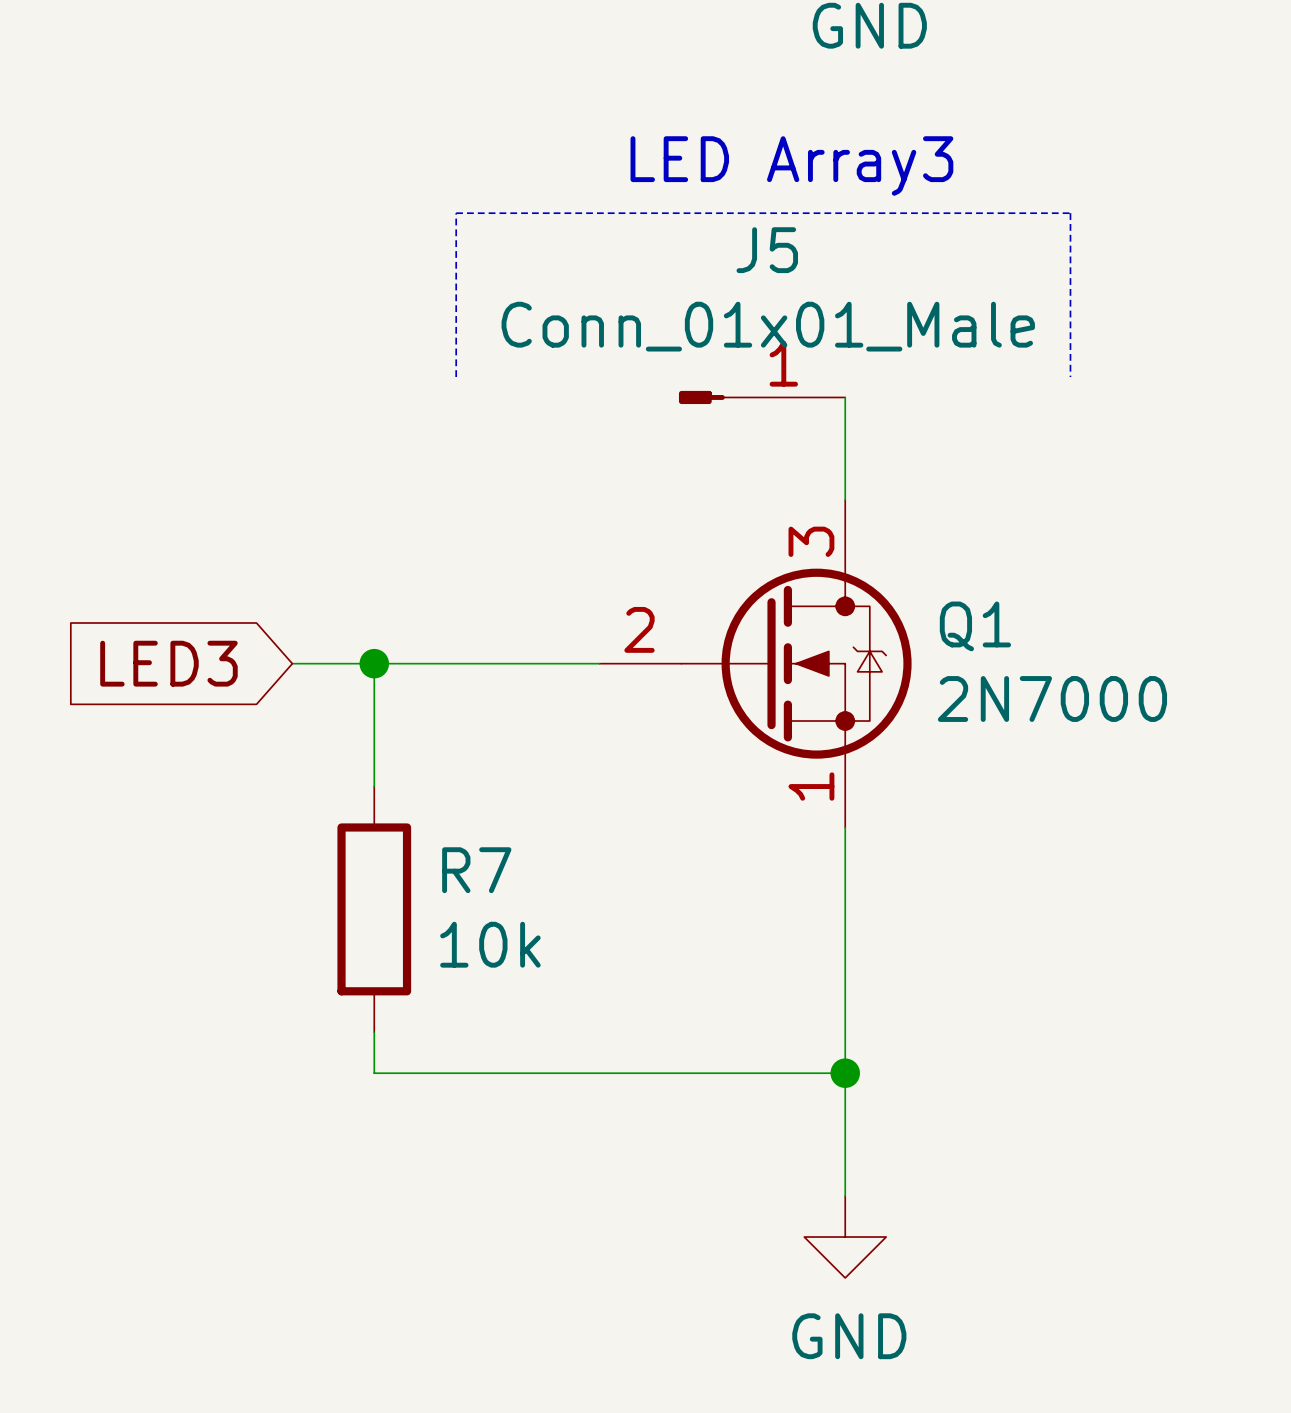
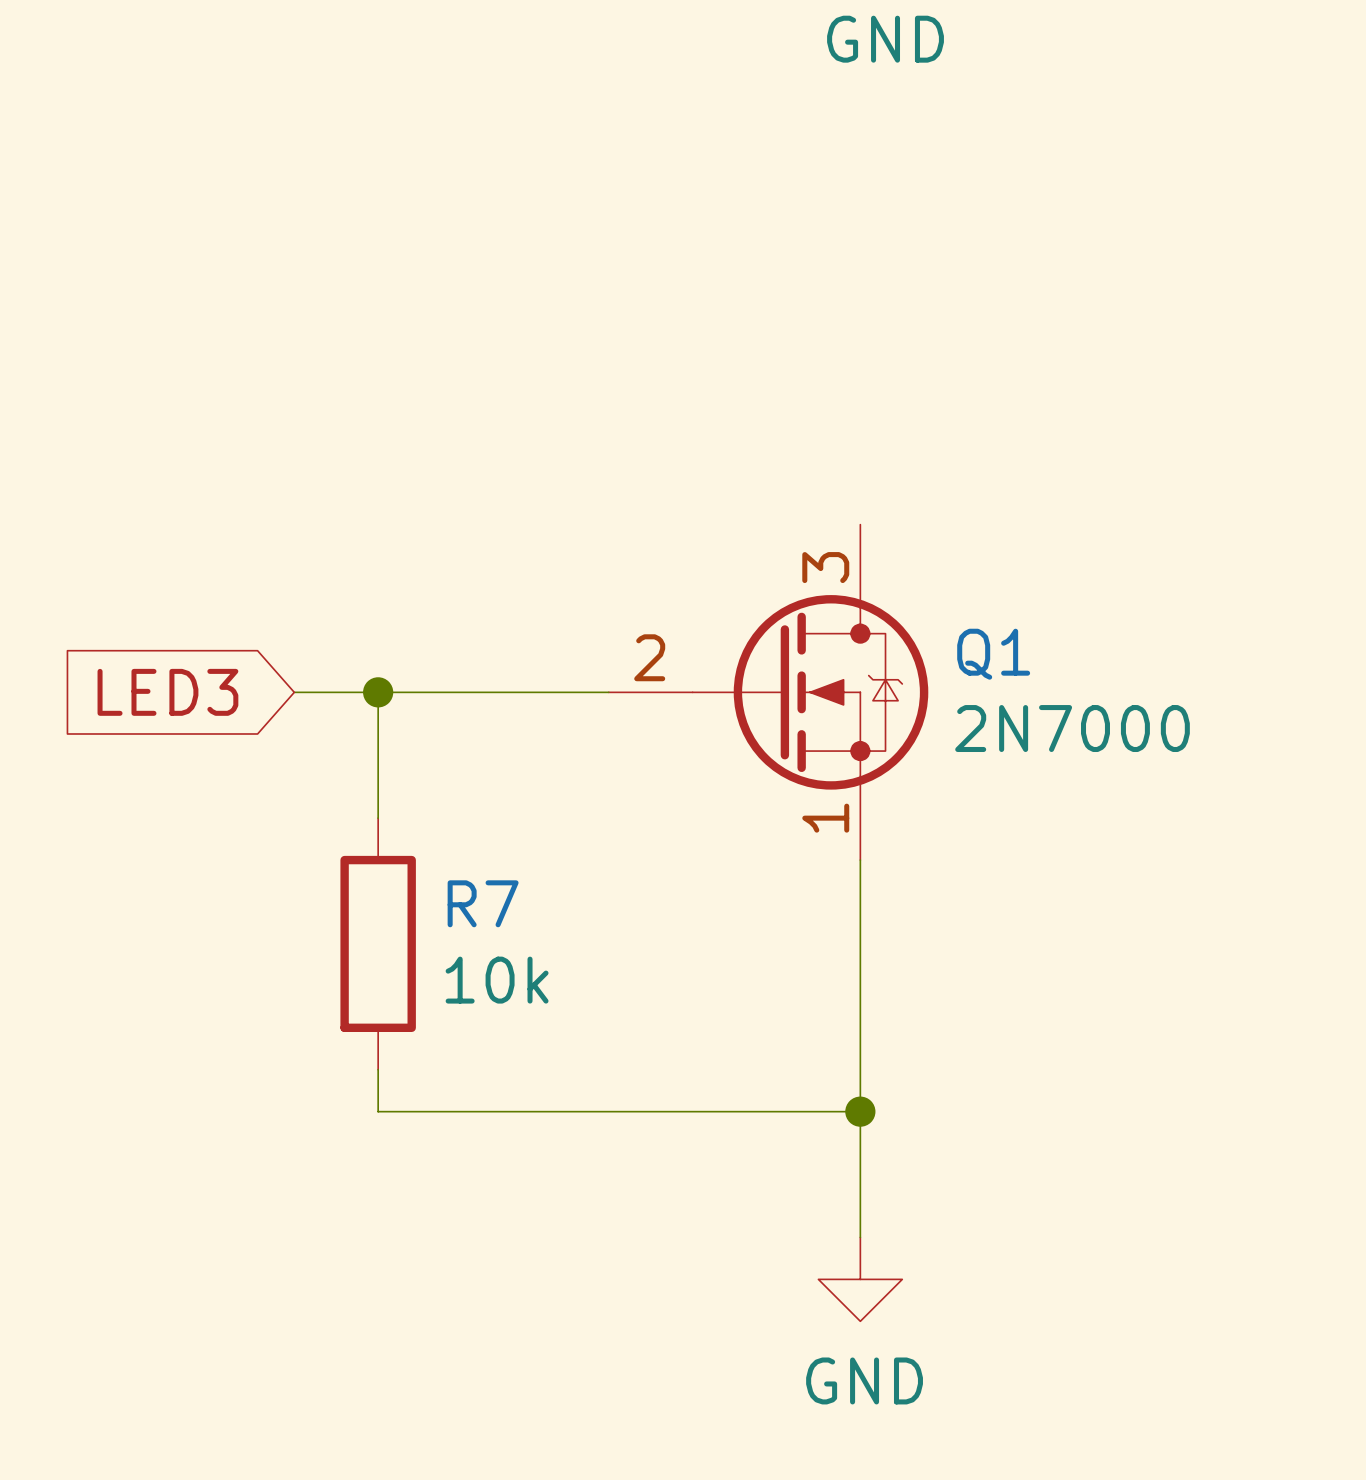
text: LED Array3 (791, 165) -> none
line: (456, 377) (456, 213) (1070, 213) (1070, 377) -> none
J5: Conn_01x01_Male (762, 397) -> none
wire: (845, 397) (845, 499) -> none

